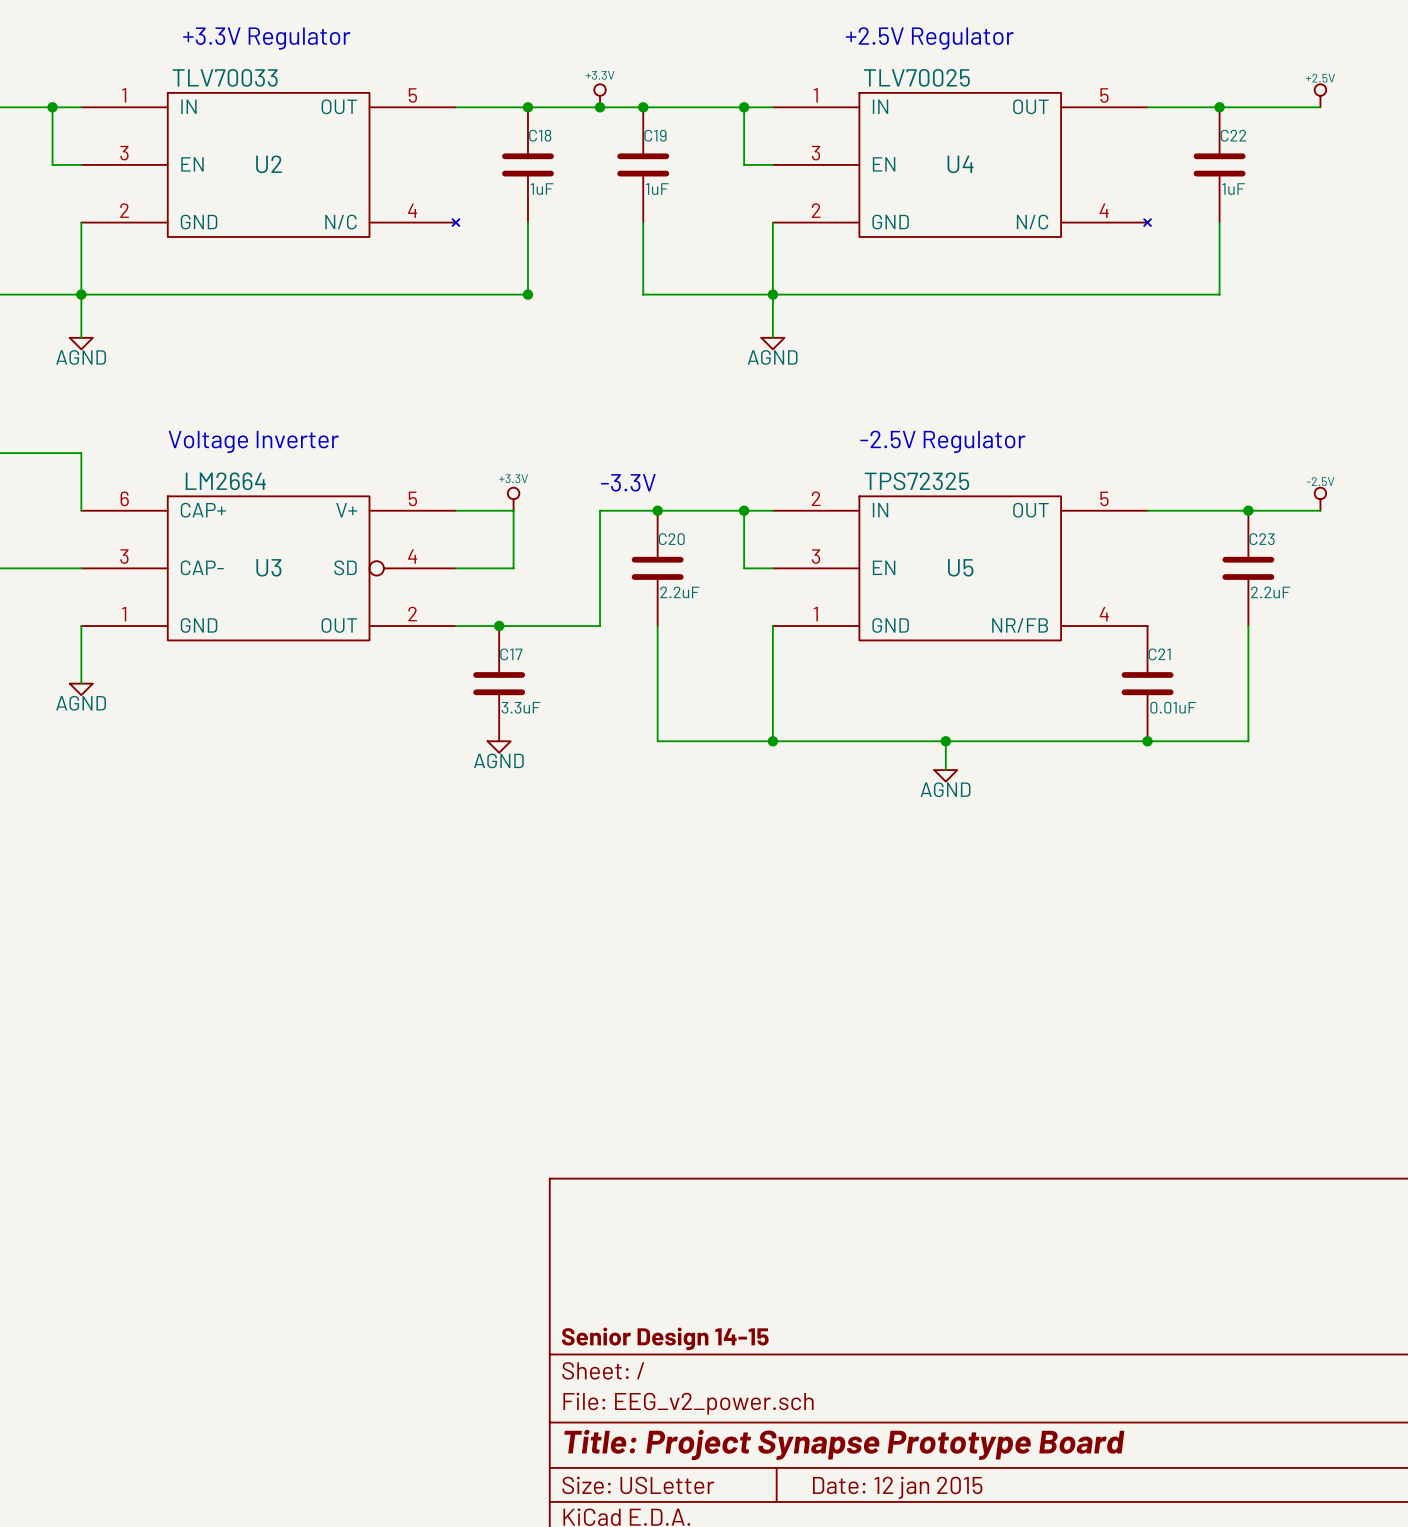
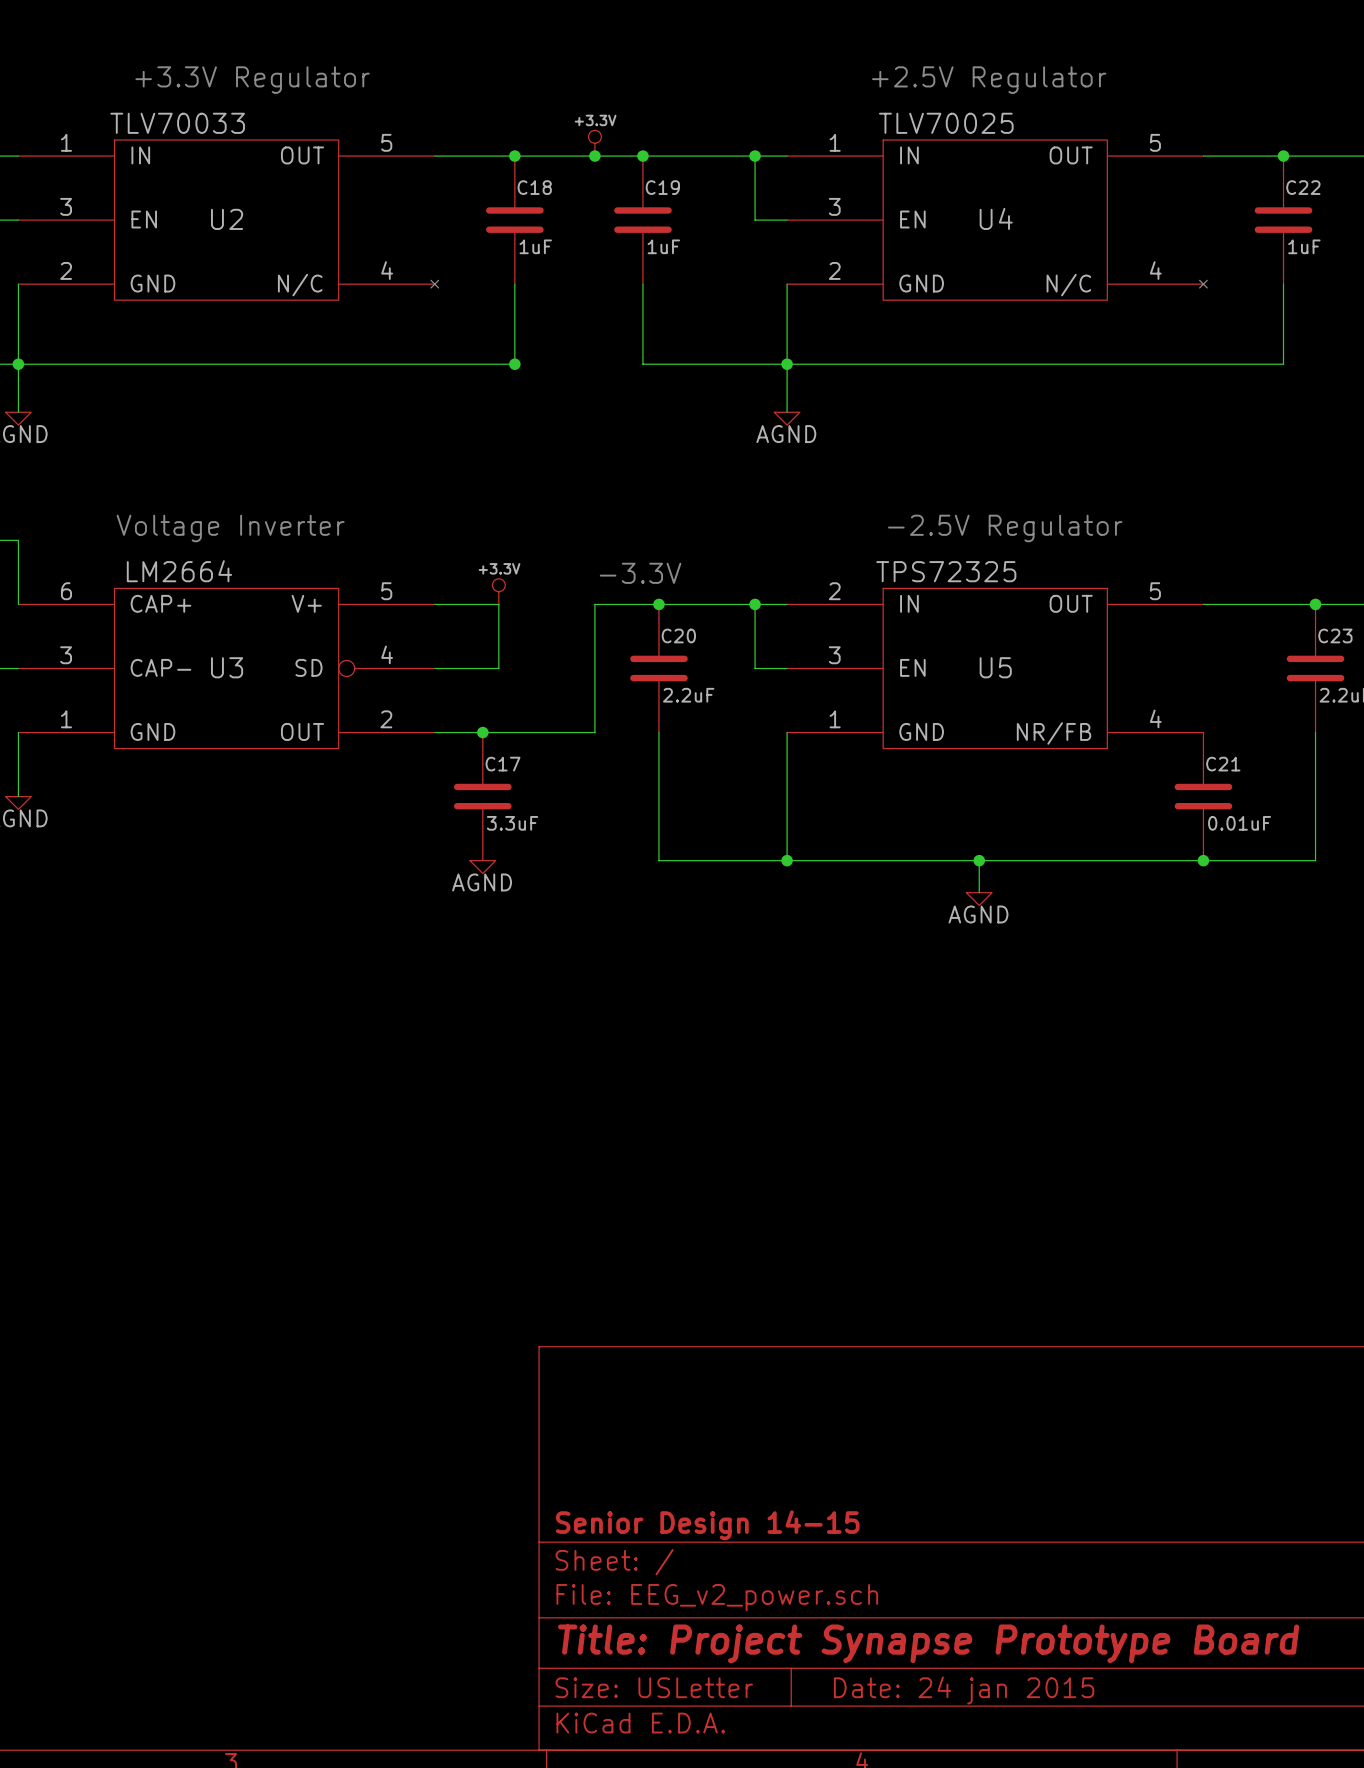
title block: Date: 12 jan 2015 (897, 1487) -> Date: 24 jan 2015 (964, 1690)

